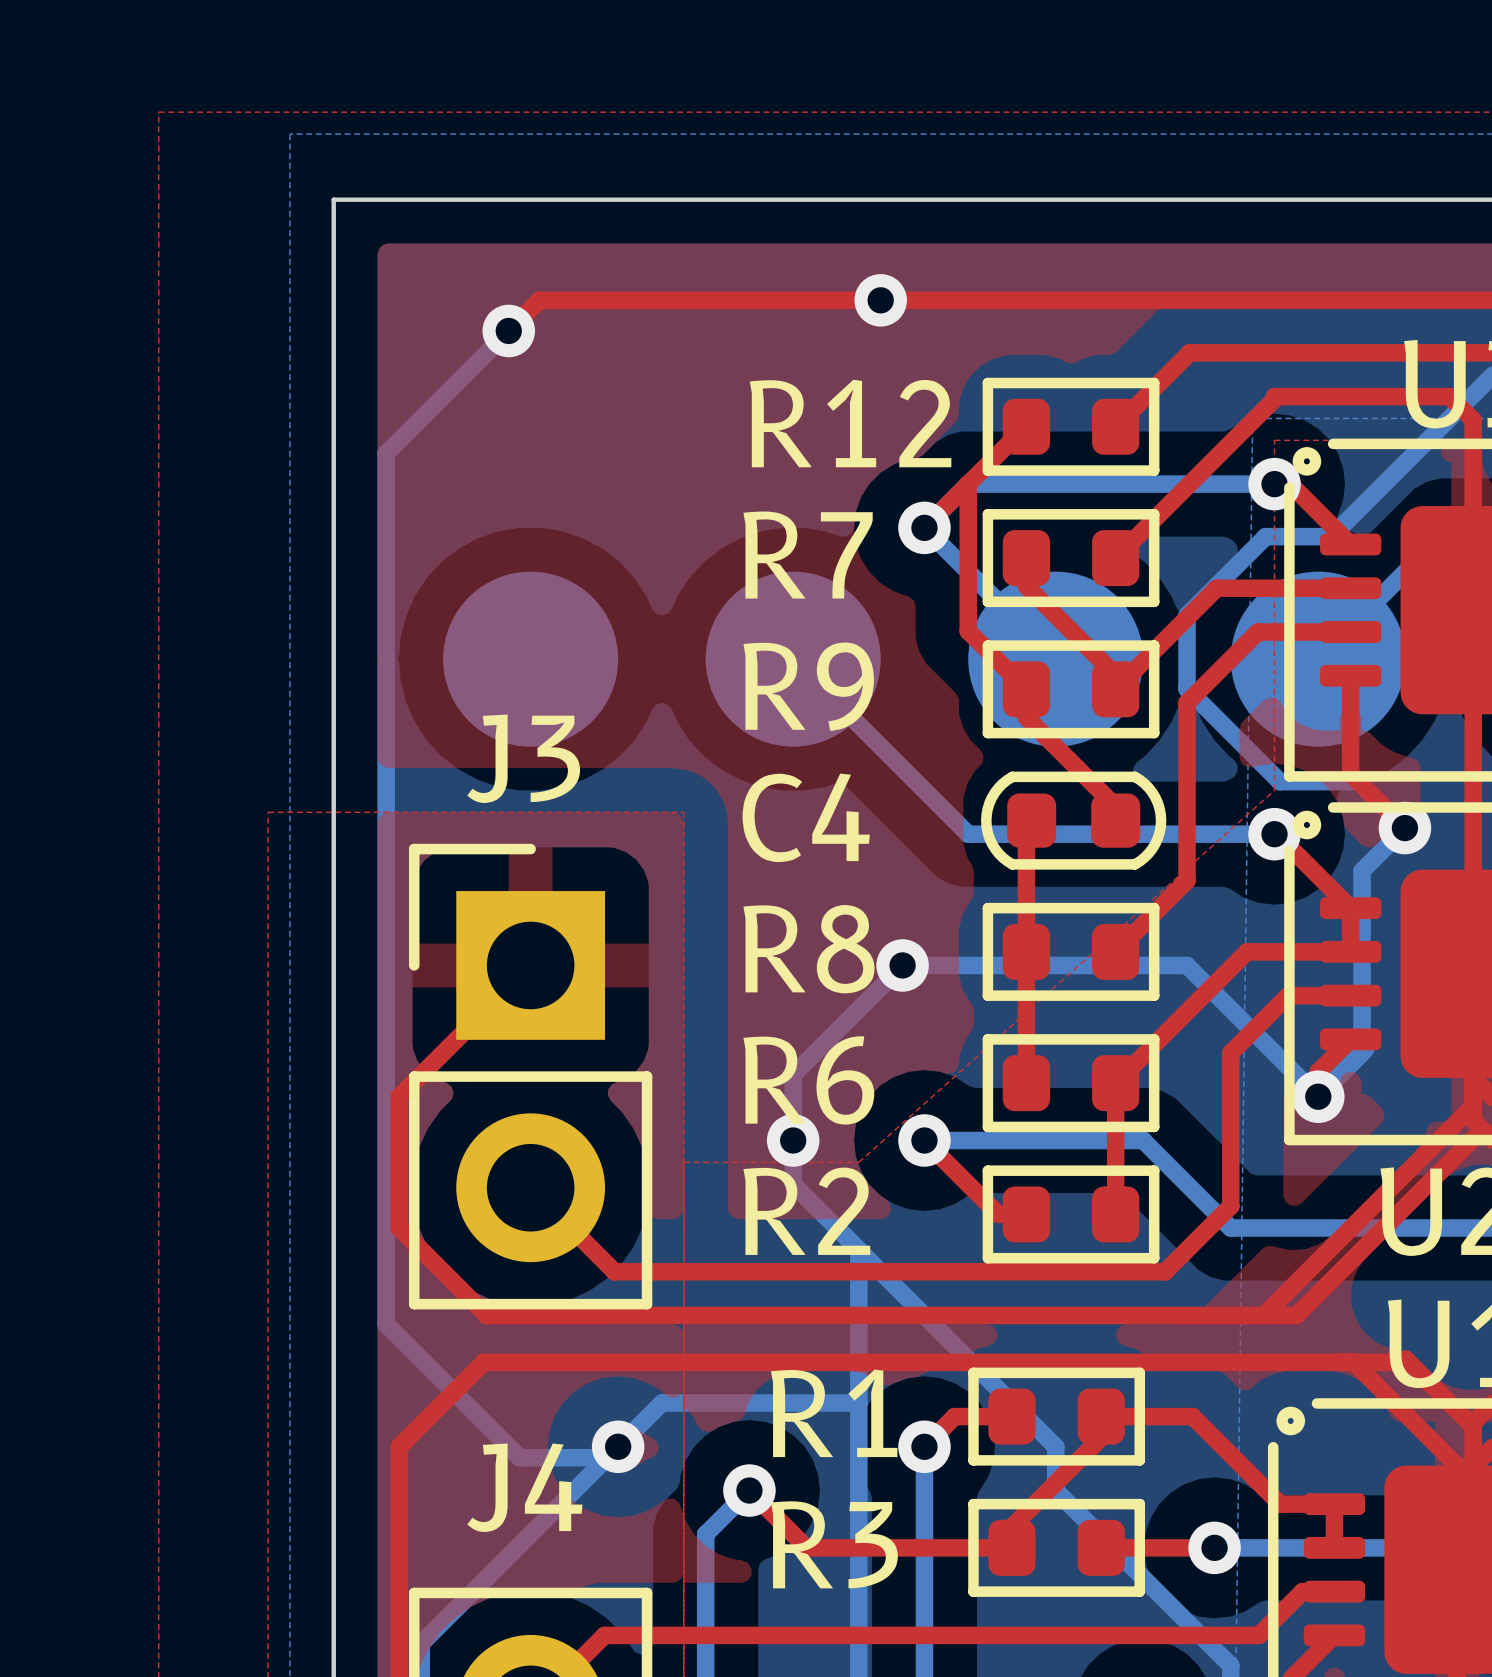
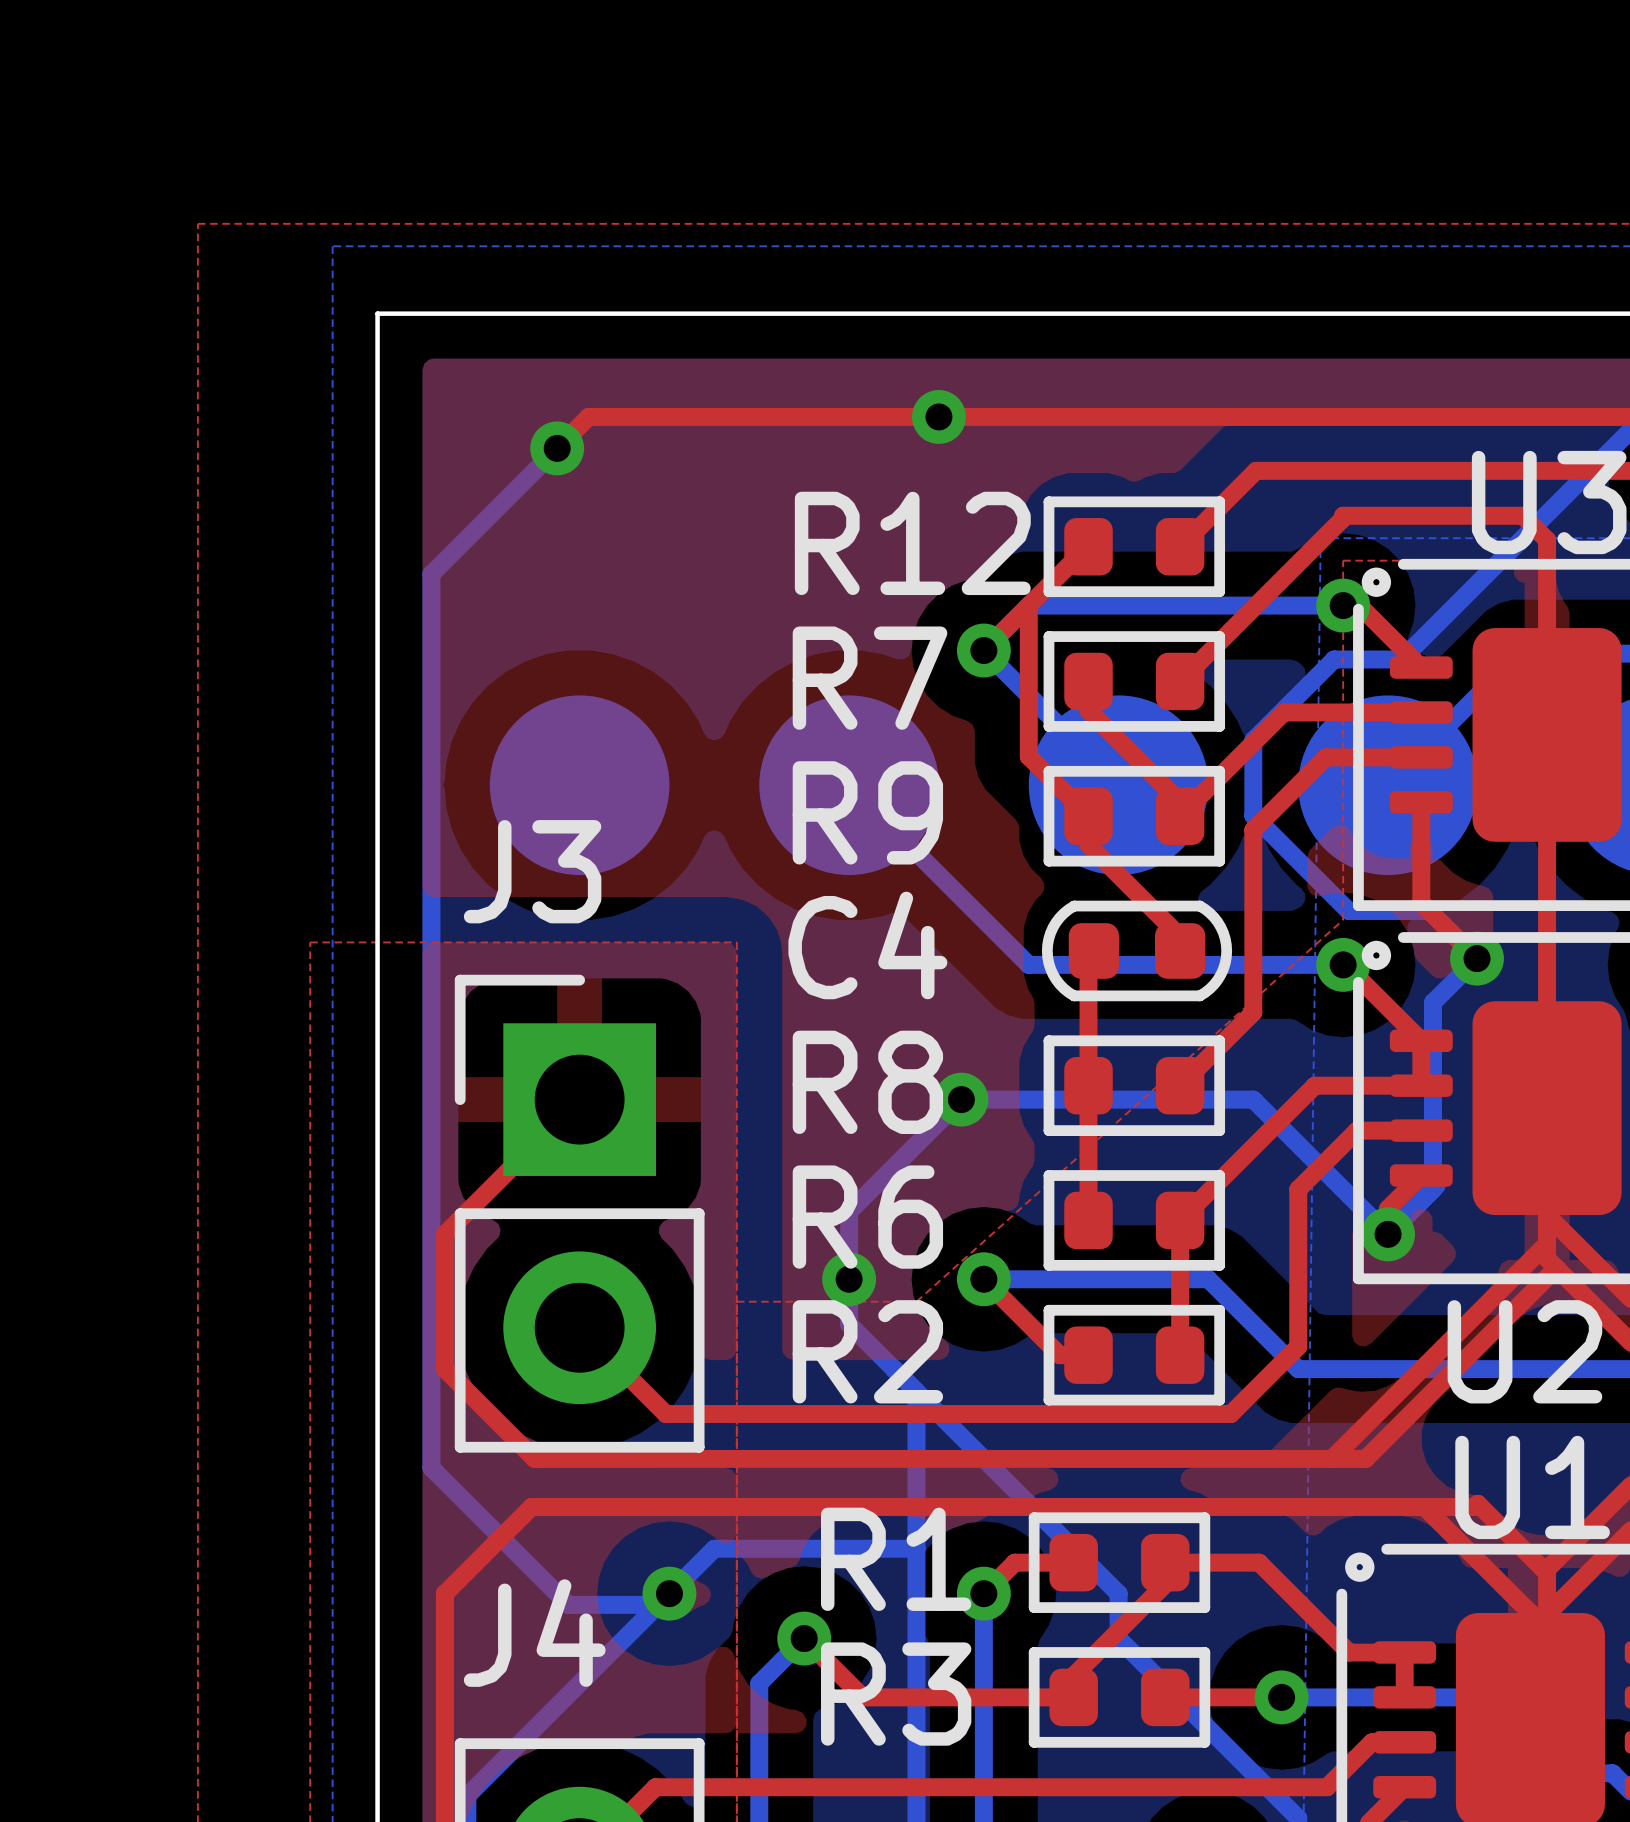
J3 name position: J3 (523, 758) -> J3 (532, 871)
J4 name position: J4 (524, 1487) -> J4 (534, 1633)

